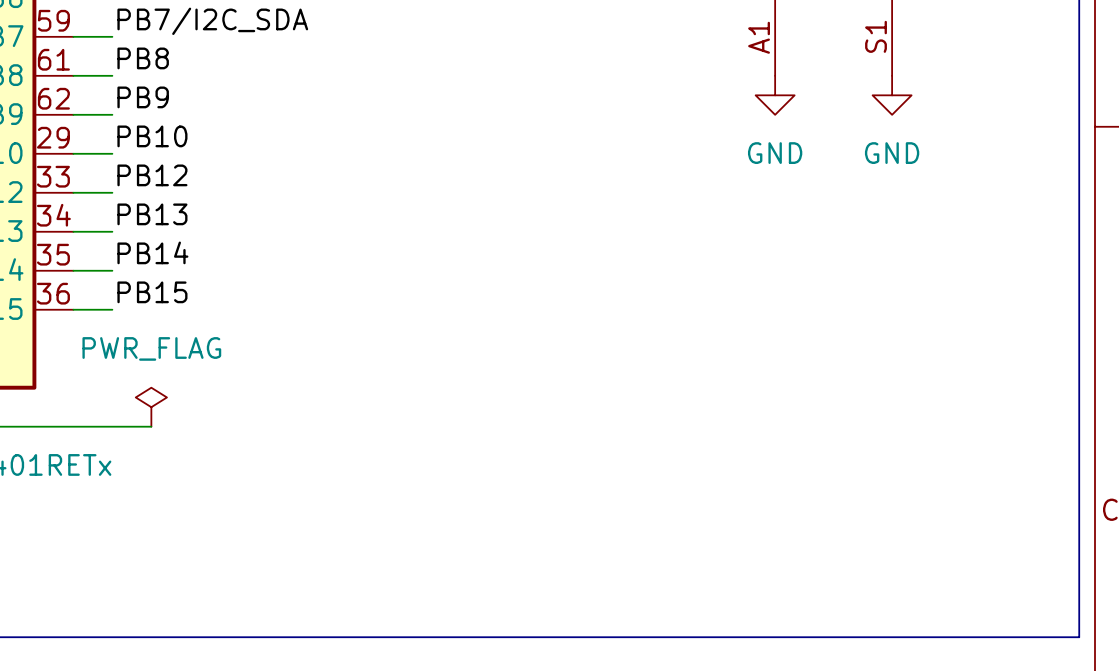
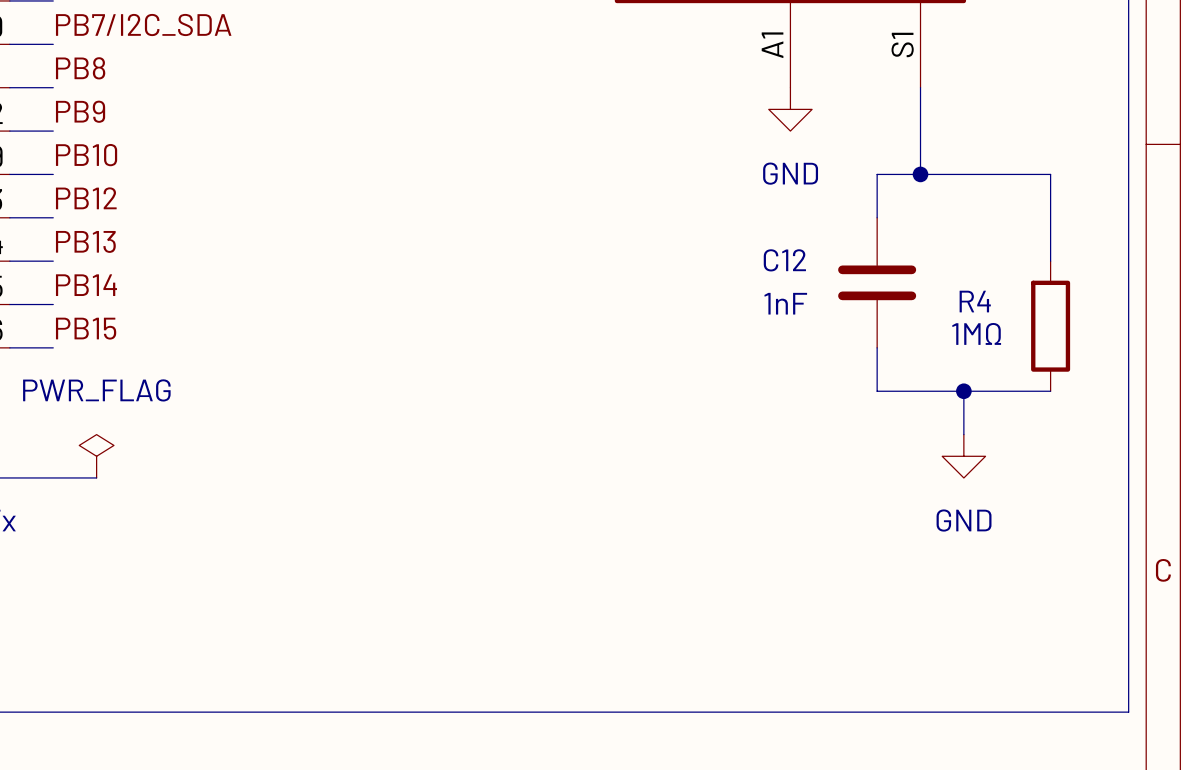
wire: none -> (920, 87) (920, 174)
power symbol position: GND (892, 95) -> GND (963, 456)
junction: none -> (920, 174)
wire: none -> (877, 217) (877, 174) (1050, 174) (1050, 261)
C12: none -> 1nF (877, 282)
R4: none -> 1MΩ (1050, 326)
wire: none -> (877, 347) (877, 391) (1050, 391)
wire: none -> (963, 391) (963, 434)
junction: none -> (963, 391)

